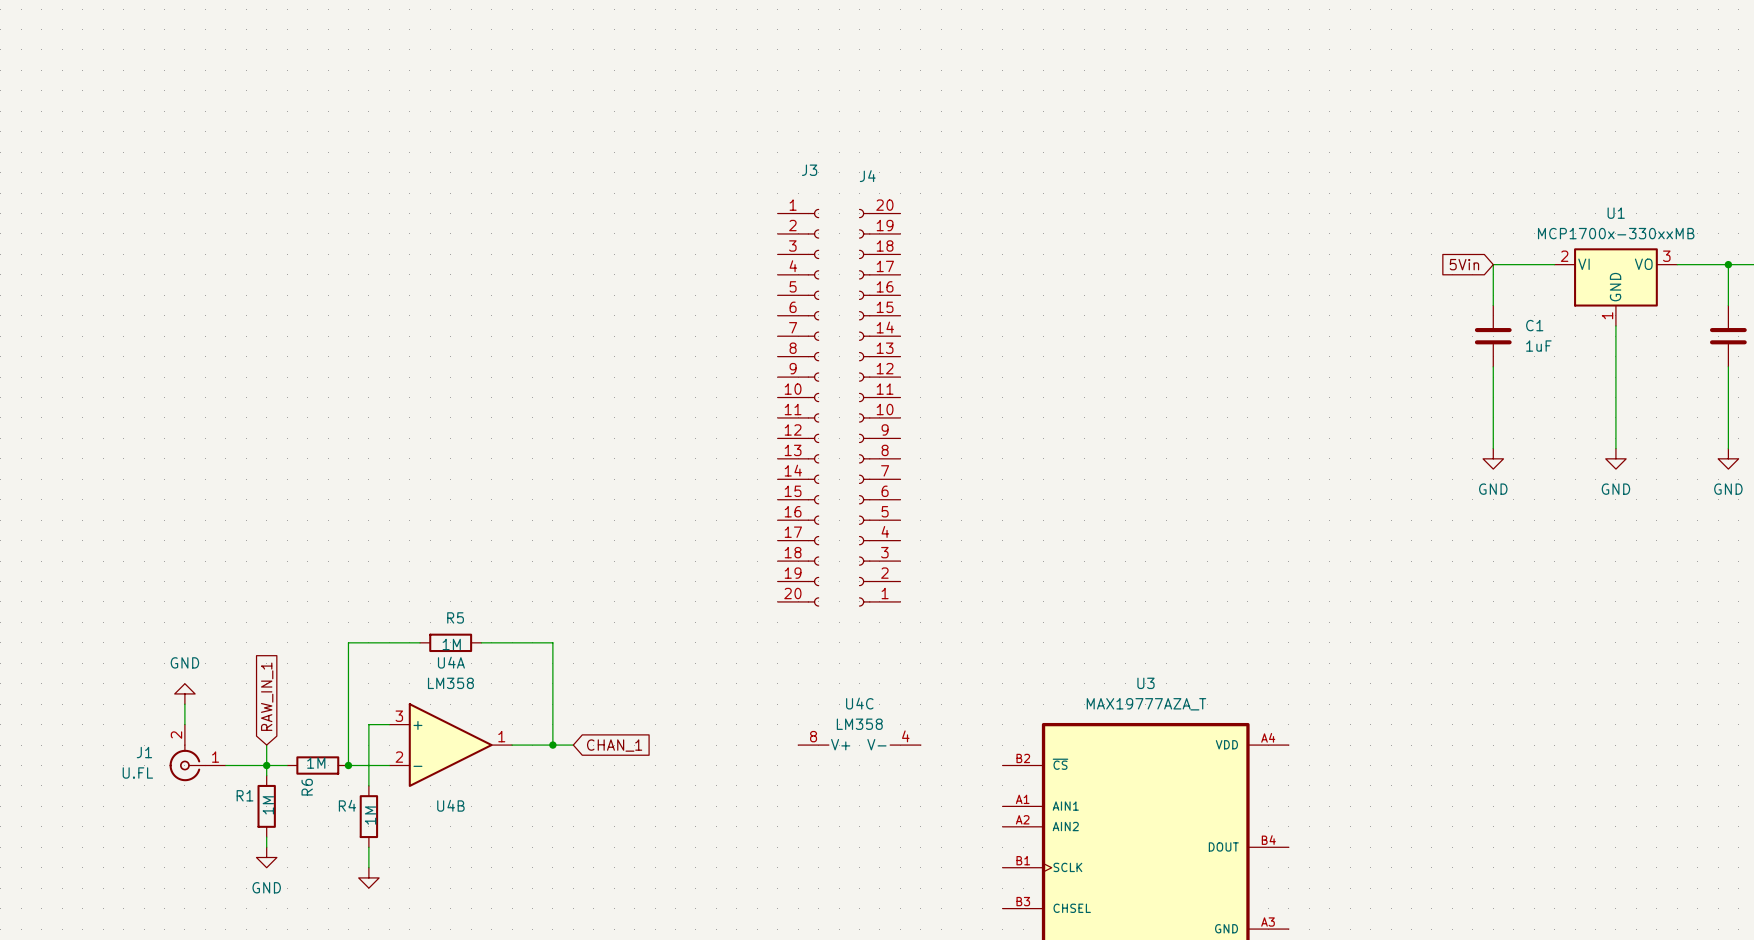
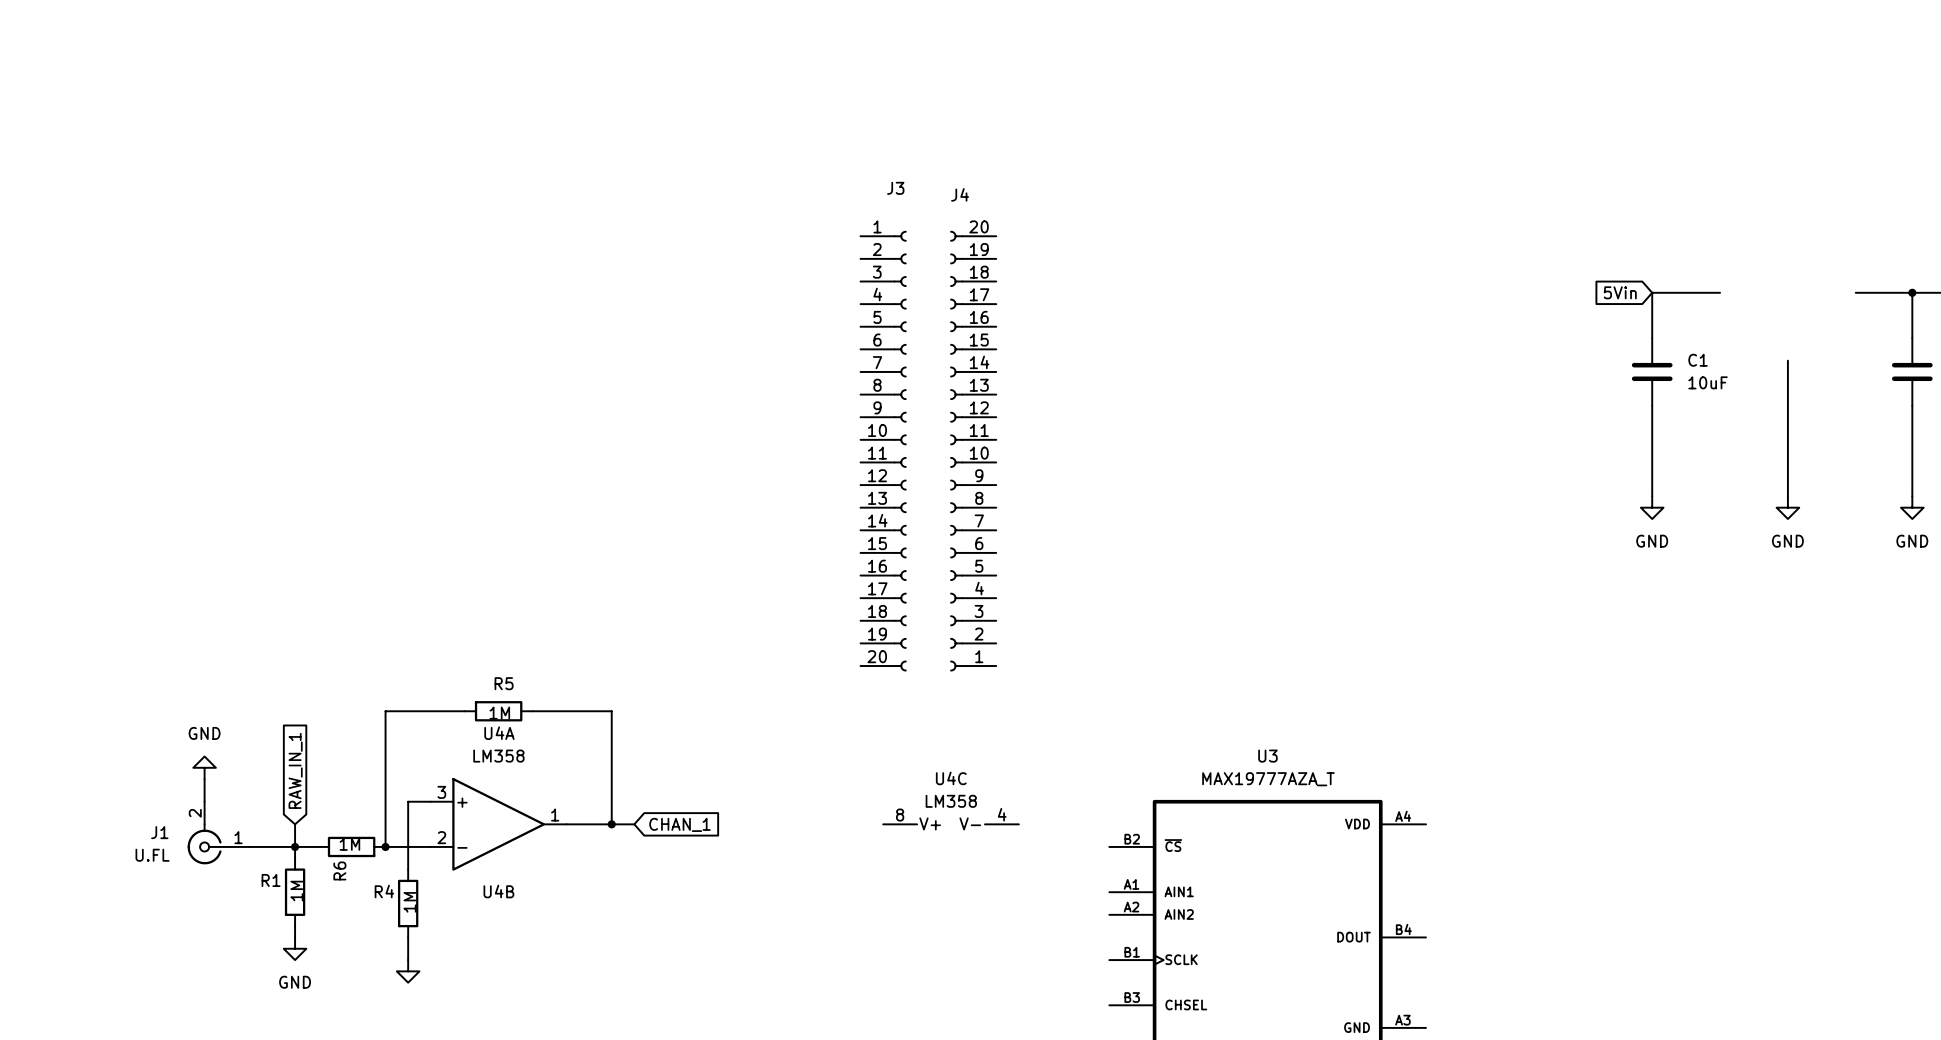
U1: MCP1700x-330xxMB (1615, 287) -> none
C1 value: 1uF (1538, 346) -> 10uF (1708, 382)

